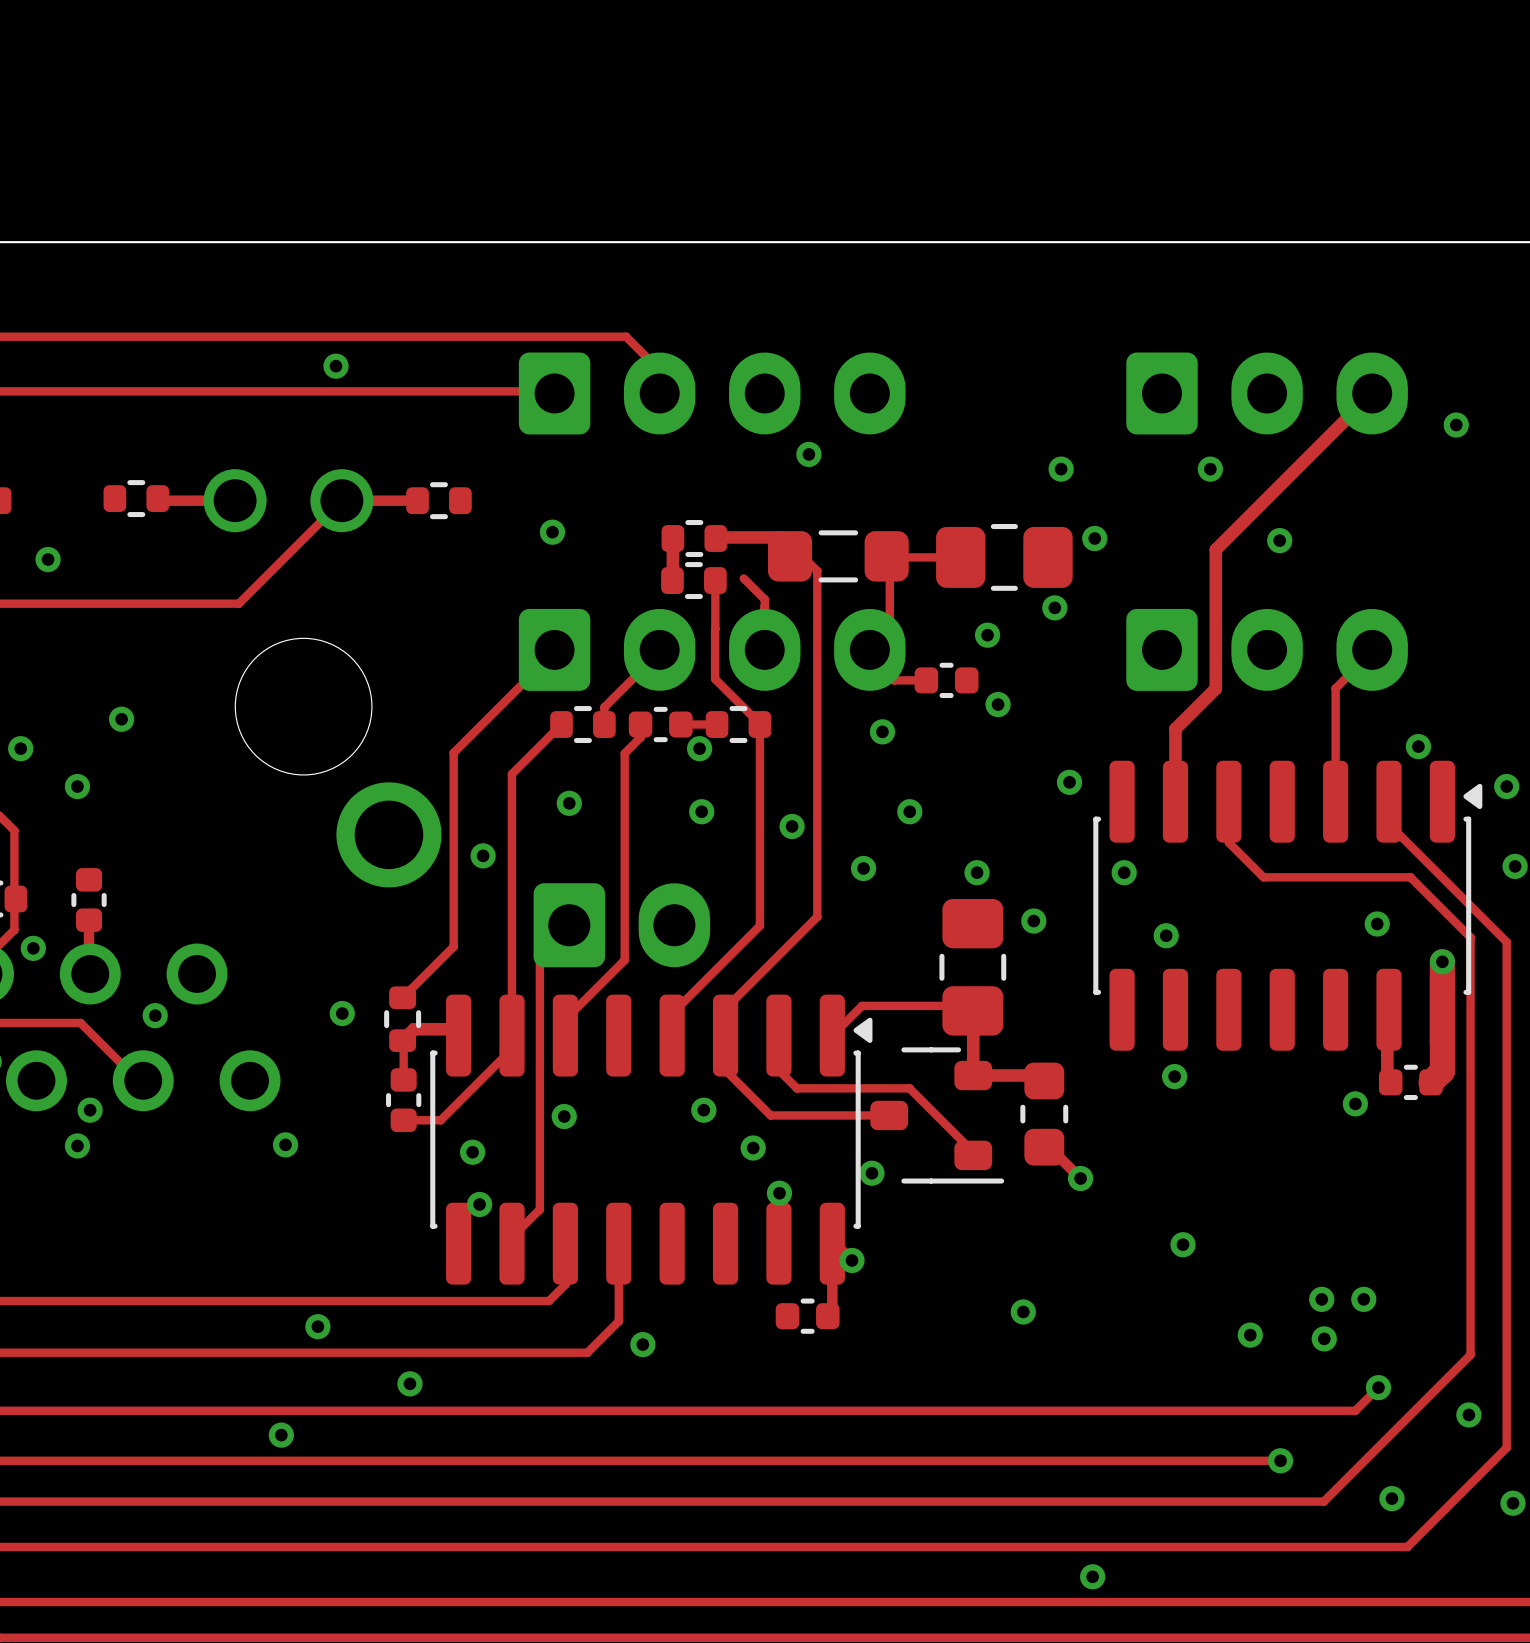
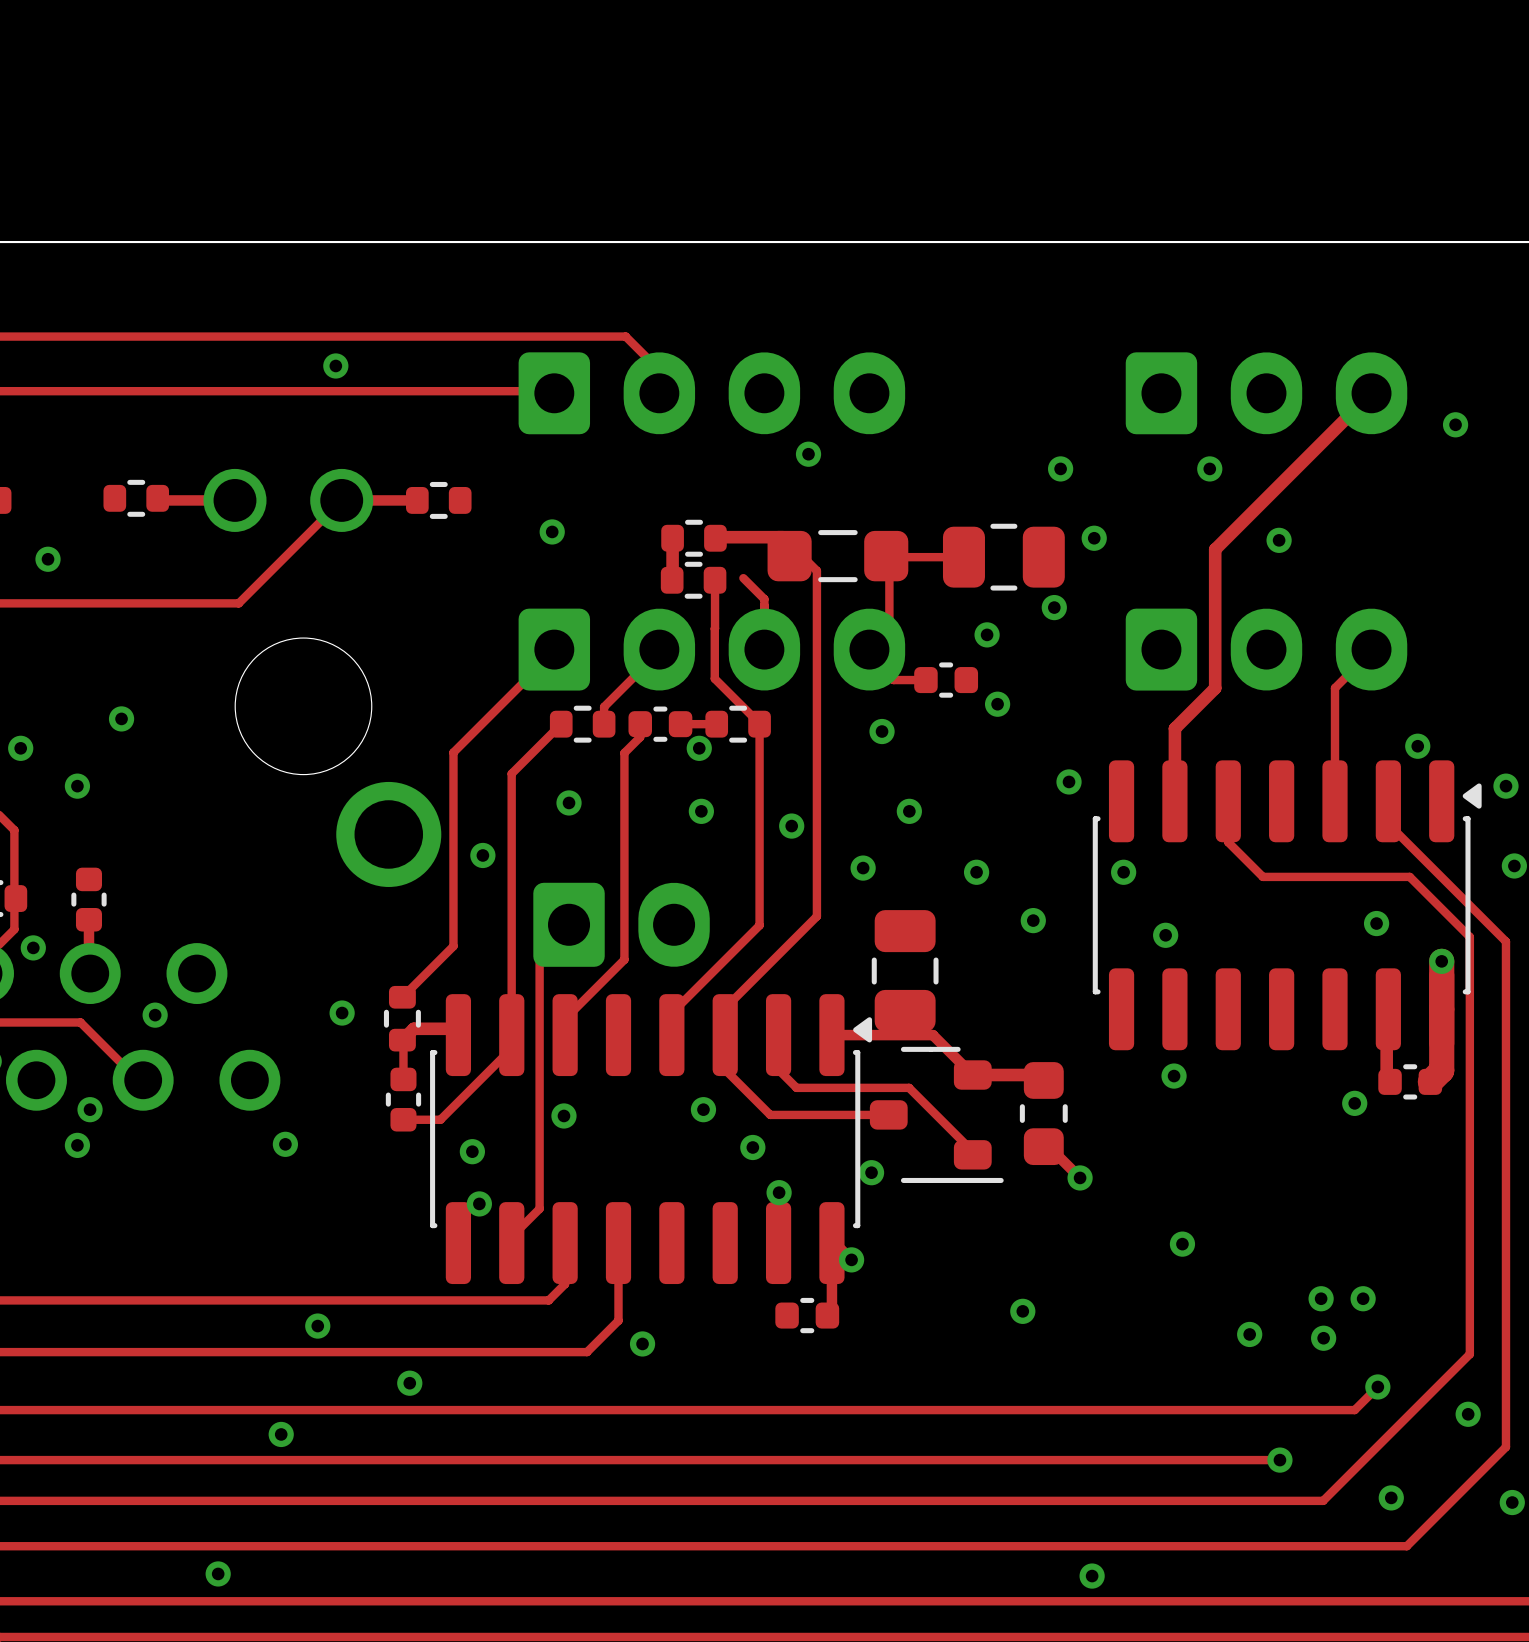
part footprint: [936, 524, 1073, 591] -> [942, 523, 1065, 591]
part: (972, 967) -> none
part: none -> (905, 971)
track: (967, 1005) (862, 1005) (832, 1035) -> (972, 1075) (932, 1035) (831, 1035)
track: (973, 1020) (973, 1075) -> none
via: none -> (218, 1573)

